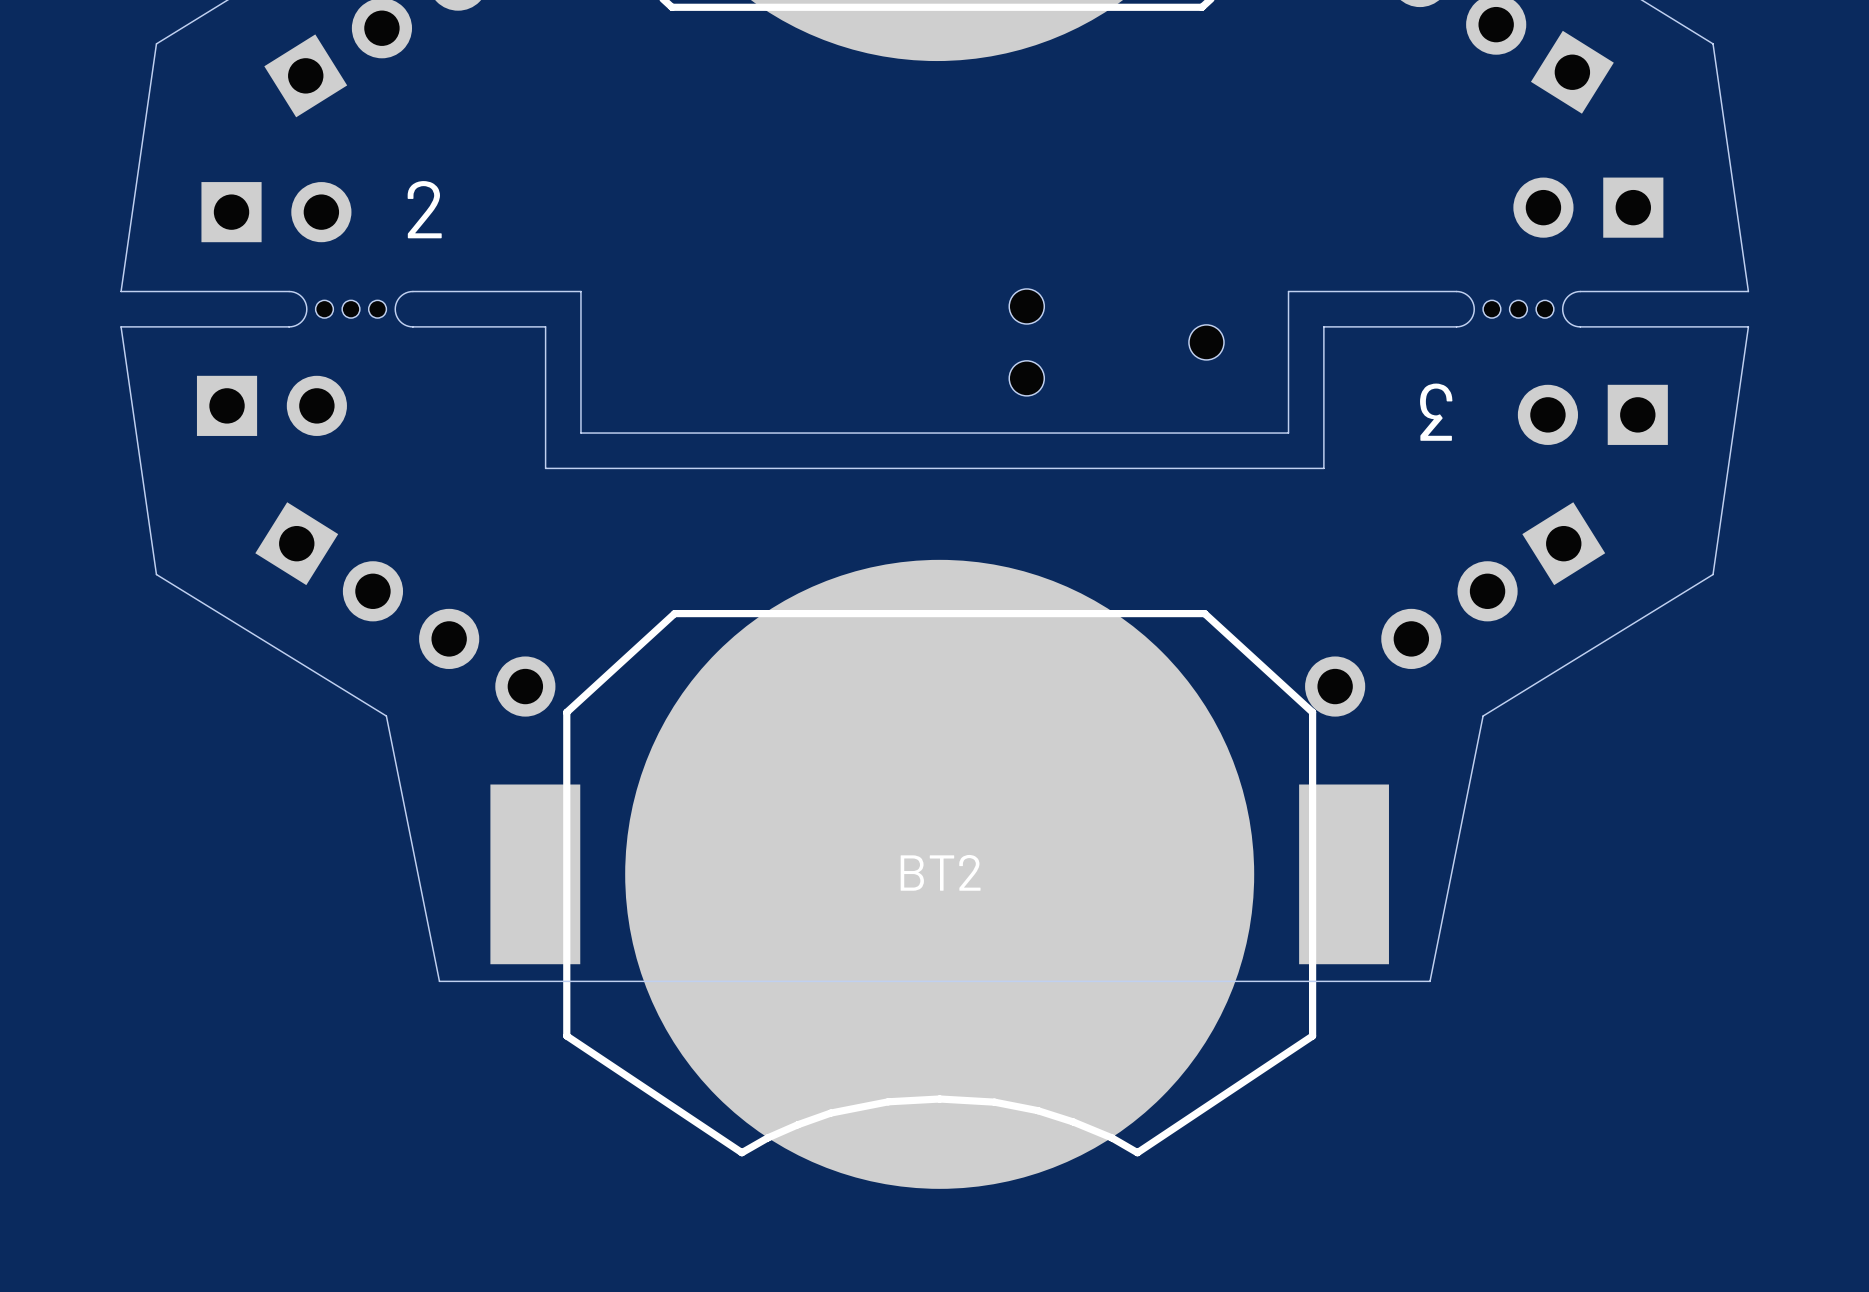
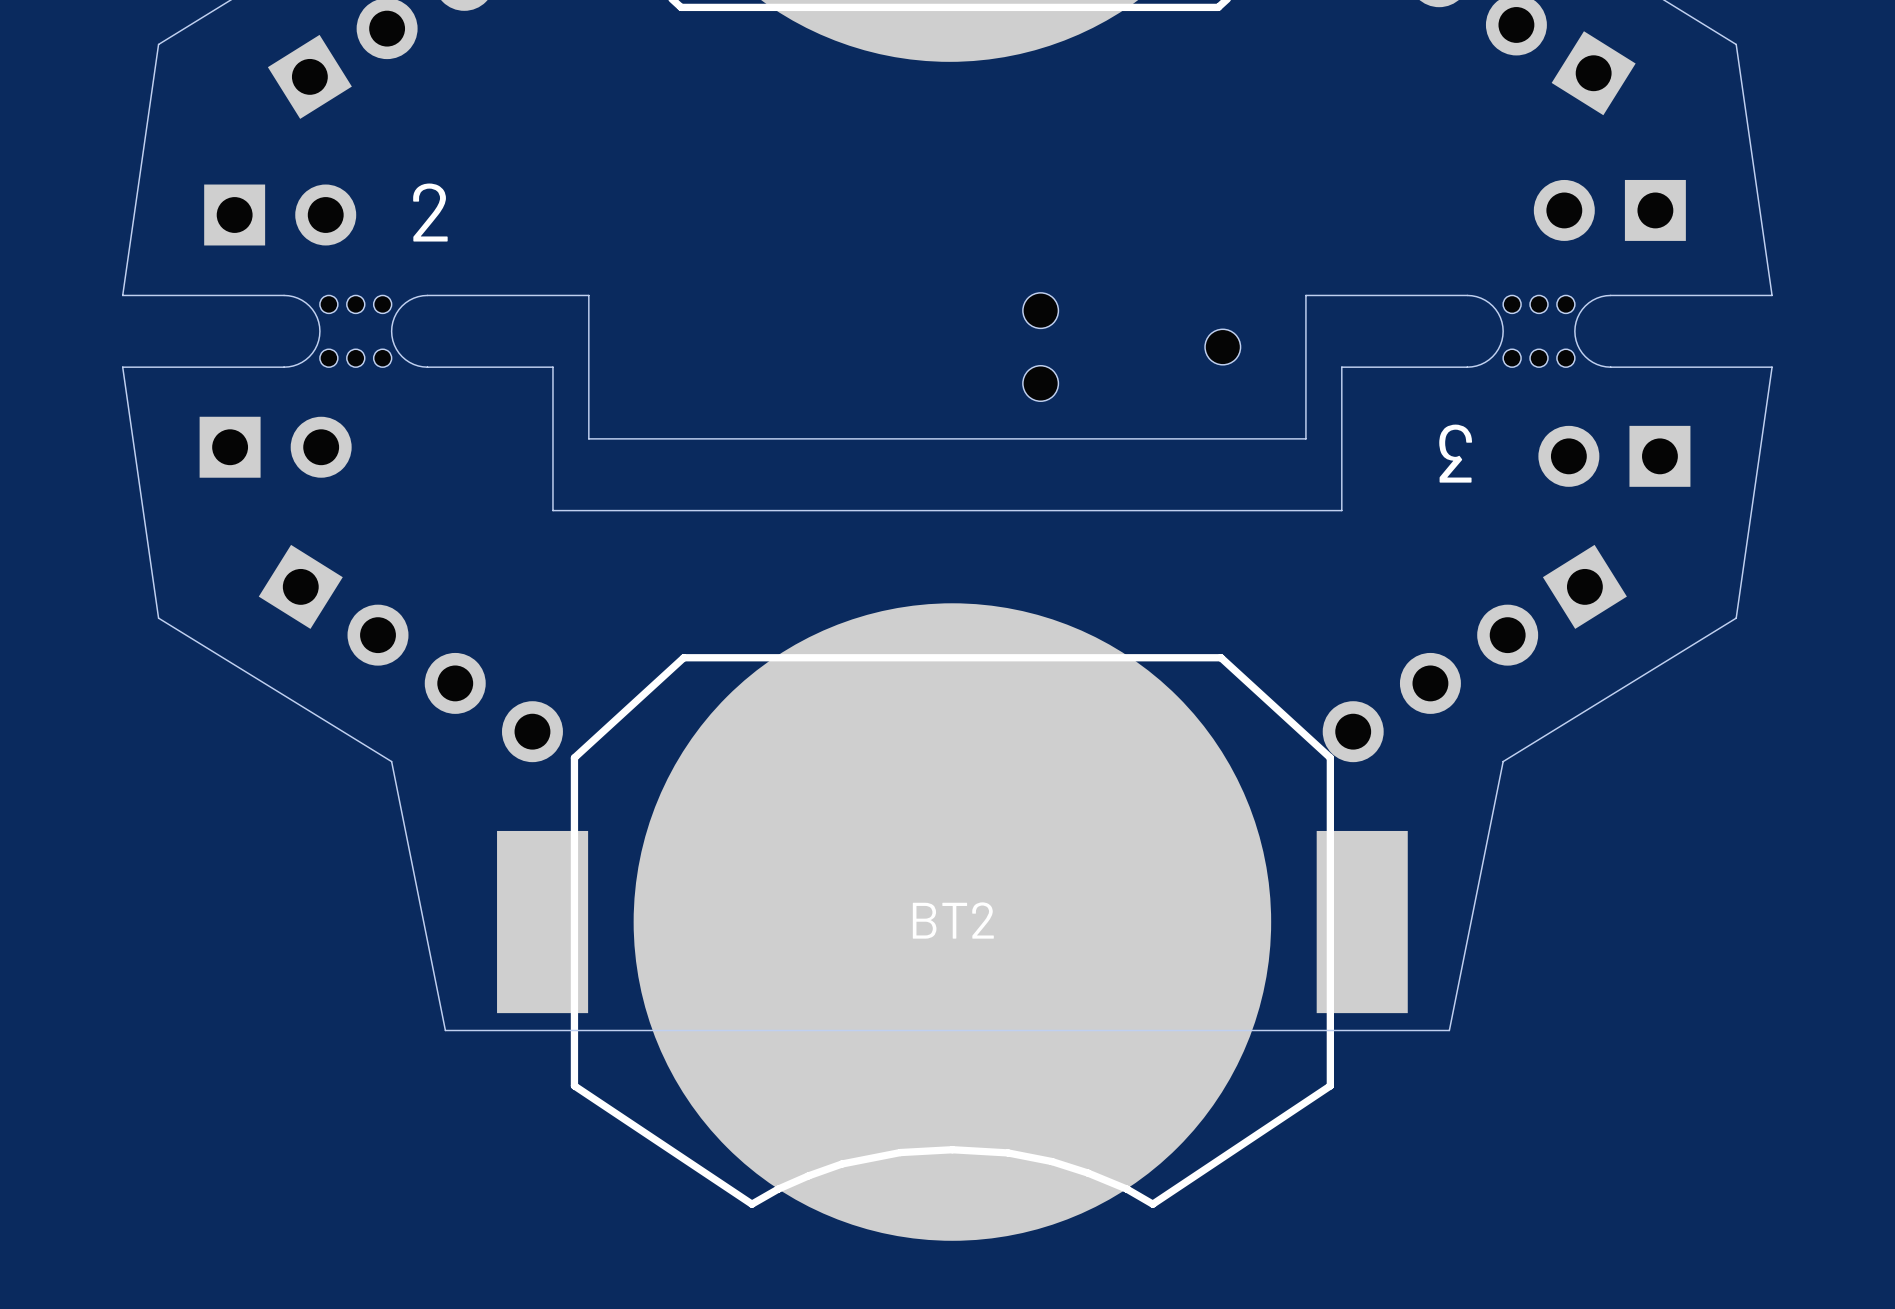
board edge: (421, 291) (406, 292) (397, 300) (395, 313) (404, 324) (412, 326) (545, 326) (545, 362) -> (427, 295) (413, 298) (405, 302) (399, 309) (392, 322) (391, 335) (394, 345) (399, 353) (409, 362) (427, 367) (552, 367)
board edge: (1447, 291) (1463, 292) (1471, 300) (1473, 313) (1465, 324) (1456, 326) (1323, 326) (1323, 362) -> (1467, 295) (1481, 298) (1489, 302) (1495, 309) (1501, 322) (1502, 335) (1500, 345) (1495, 353) (1485, 362) (1467, 367) (1341, 367)
board edge: (1589, 291) (1573, 292) (1565, 300) (1563, 313) (1571, 324) (1580, 326) (1748, 326) (1713, 574) (1483, 716) (1430, 981) (439, 981) (386, 716) (156, 574) (121, 326) (289, 326) (297, 324) (306, 313) (304, 300) (295, 292) (280, 291) -> (1610, 295) (1597, 298) (1585, 305) (1579, 313) (1575, 326) (1575, 335) (1579, 349) (1585, 356) (1597, 364) (1610, 367) (1772, 367) (1736, 618) (1503, 761) (1449, 1030) (445, 1030) (391, 761) (158, 618) (122, 367) (284, 367) (297, 364) (309, 356) (315, 349) (319, 335) (319, 326) (315, 313) (309, 305) (297, 298) (284, 295)
part footprint: [315, 300, 387, 319] -> [319, 295, 392, 368]
part footprint: [1483, 300, 1554, 319] -> [1503, 295, 1575, 368]
part position: (271, 405) -> (275, 447)
text position: 3 (1436, 412) -> 3 (1455, 453)
part position: (1592, 414) -> (1614, 456)
board edge: (1323, 468) (545, 468) -> (1341, 474) (1341, 510) (552, 510) (552, 474)
part position: (405, 609) -> (410, 653)
part position: (1455, 609) -> (1474, 653)
part position: (939, 874) -> (952, 922)

